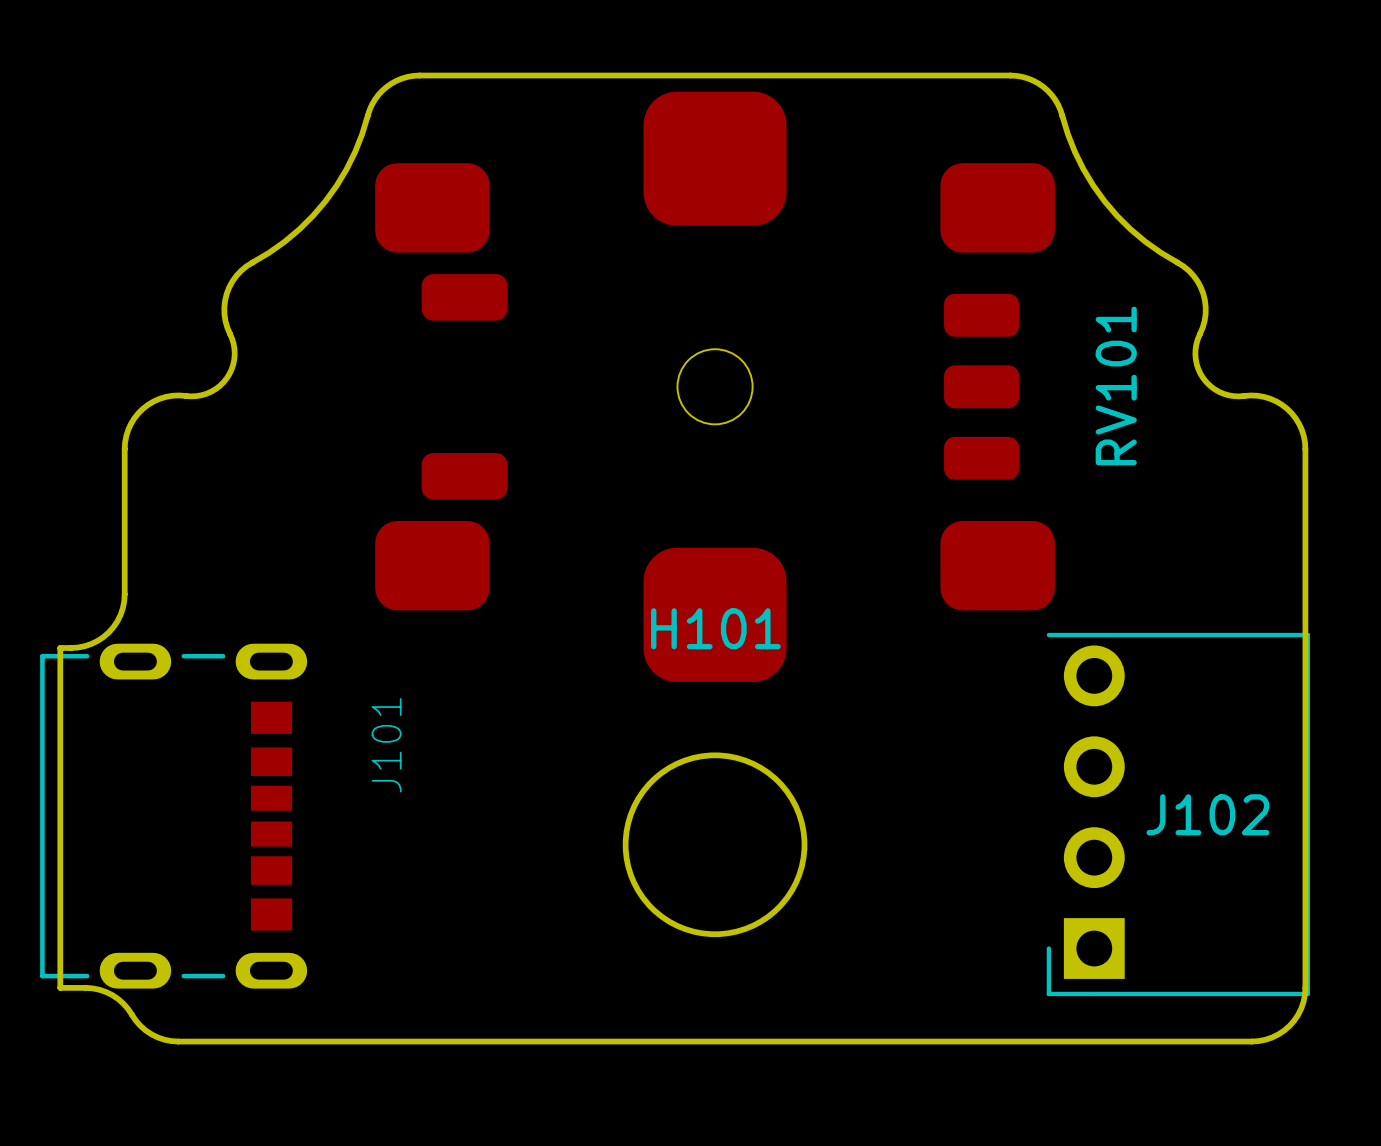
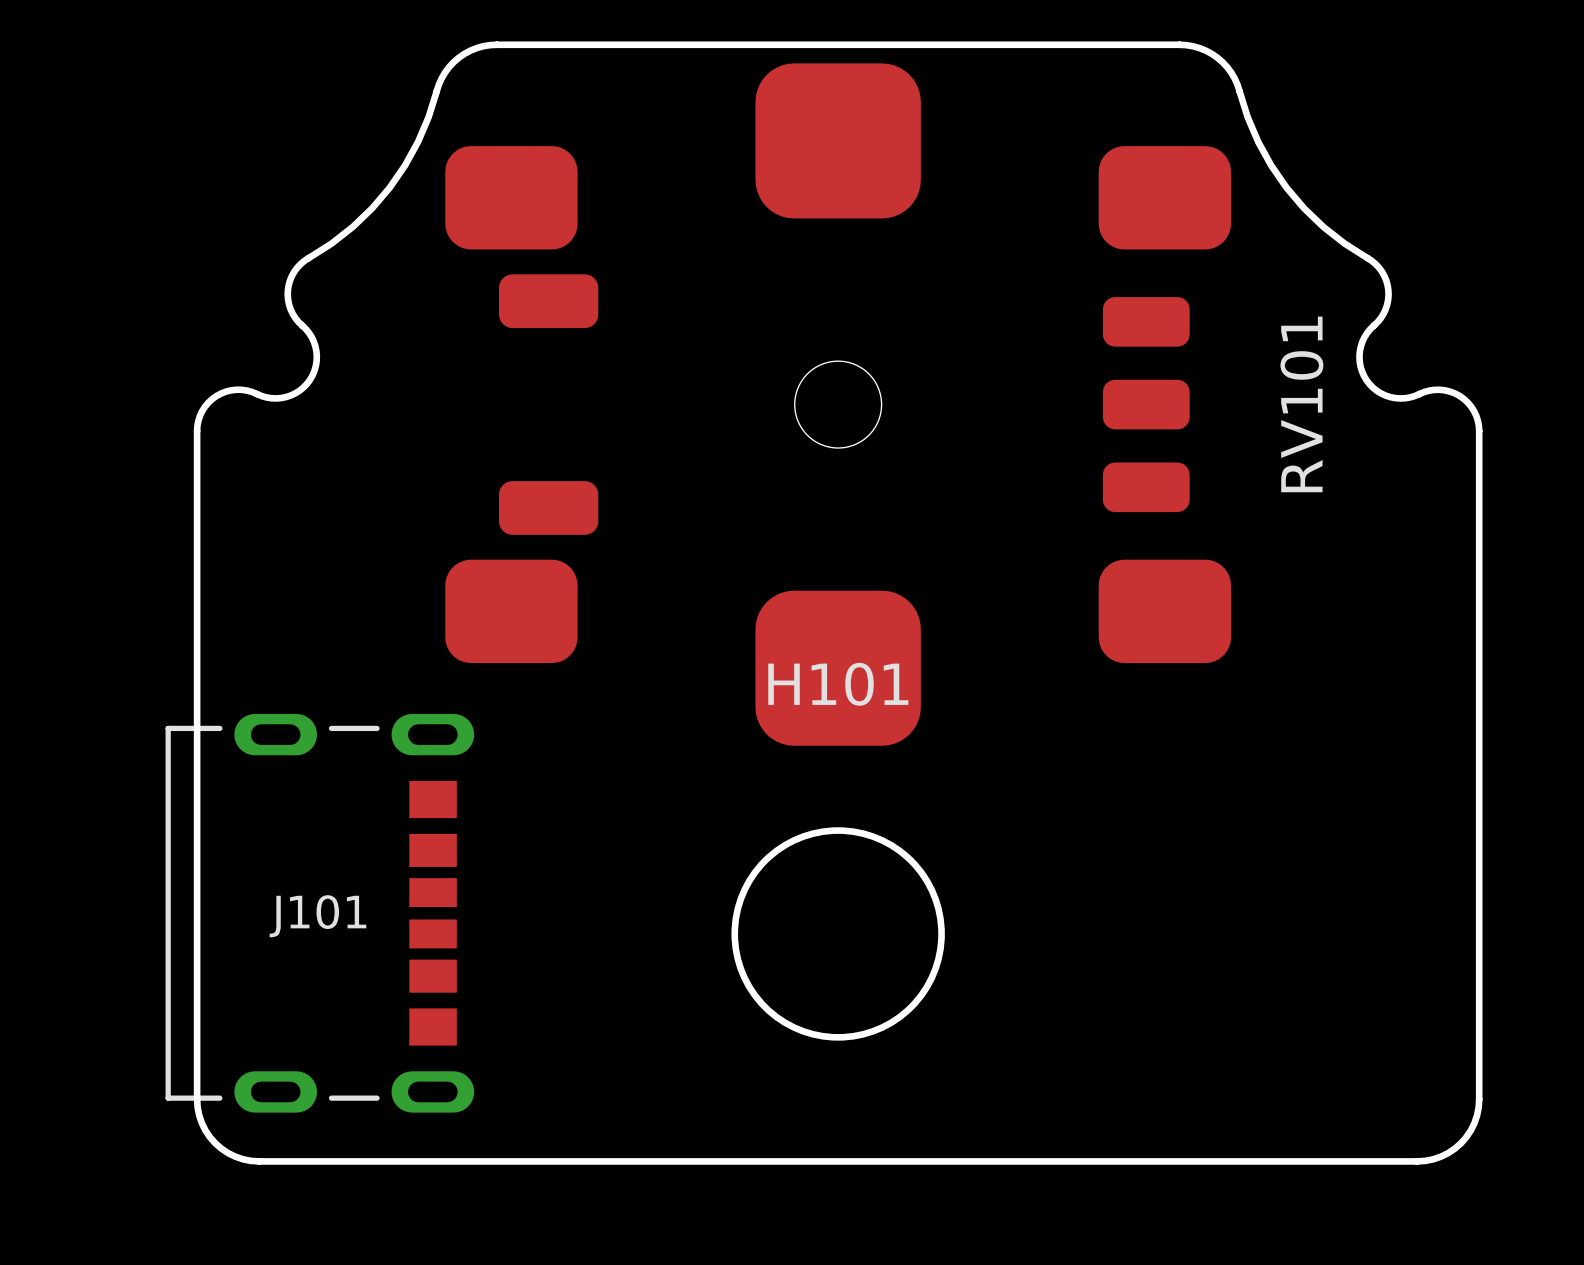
board edge: (367, 115) (355, 151) (346, 169) (325, 201) (299, 229) (284, 241) (241, 270) (229, 287) (225, 300) (224, 314) (233, 343) (234, 354) (233, 364) (226, 378) (215, 389) (206, 393) (196, 396) (172, 395) (153, 401) (138, 413) (130, 423) (126, 436) (124, 449) (124, 594) (122, 608) (113, 626) (97, 640) (78, 647) (60, 647) (60, 987) (92, 988) (112, 995) (123, 1003) (140, 1025) (157, 1037) (171, 1041) (214, 1041) -> (436, 91) (418, 141) (389, 187) (352, 226) (304, 260) (291, 275) (287, 290) (289, 304) (295, 318) (311, 337) (316, 351) (315, 366) (309, 379) (299, 390) (281, 398) (266, 397) (241, 389) (221, 393) (205, 406) (197, 425) (197, 1107) (205, 1130) (221, 1148) (235, 1156) (259, 1161)
board edge: (1062, 115) (1074, 151) (1093, 185) (1104, 201) (1117, 215) (1145, 241) (1188, 270) (1200, 287) (1204, 300) (1205, 314) (1196, 343) (1195, 354) (1196, 364) (1203, 378) (1210, 386) (1223, 393) (1233, 396) (1263, 396) (1281, 404) (1295, 418) (1301, 429) (1305, 442) (1304, 994) (1301, 1008) (1294, 1020) (1278, 1034) (1258, 1041) (1215, 1041) -> (1239, 91) (1258, 141) (1286, 187) (1323, 227) (1371, 260) (1384, 275) (1388, 290) (1387, 304) (1380, 318) (1364, 337) (1359, 351) (1360, 366) (1366, 379) (1380, 393) (1395, 398) (1409, 397) (1434, 389) (1454, 393) (1471, 406) (1478, 425) (1478, 1107) (1470, 1130) (1454, 1148) (1440, 1156) (1417, 1161)
J101 name rotation: 0° (386, 745) -> 90° clockwise (317, 916)
J101 name position: J101 (386, 745) -> J101 (317, 916)
J102: (1178, 814) -> none
J101 position: (173, 816) -> (319, 913)

